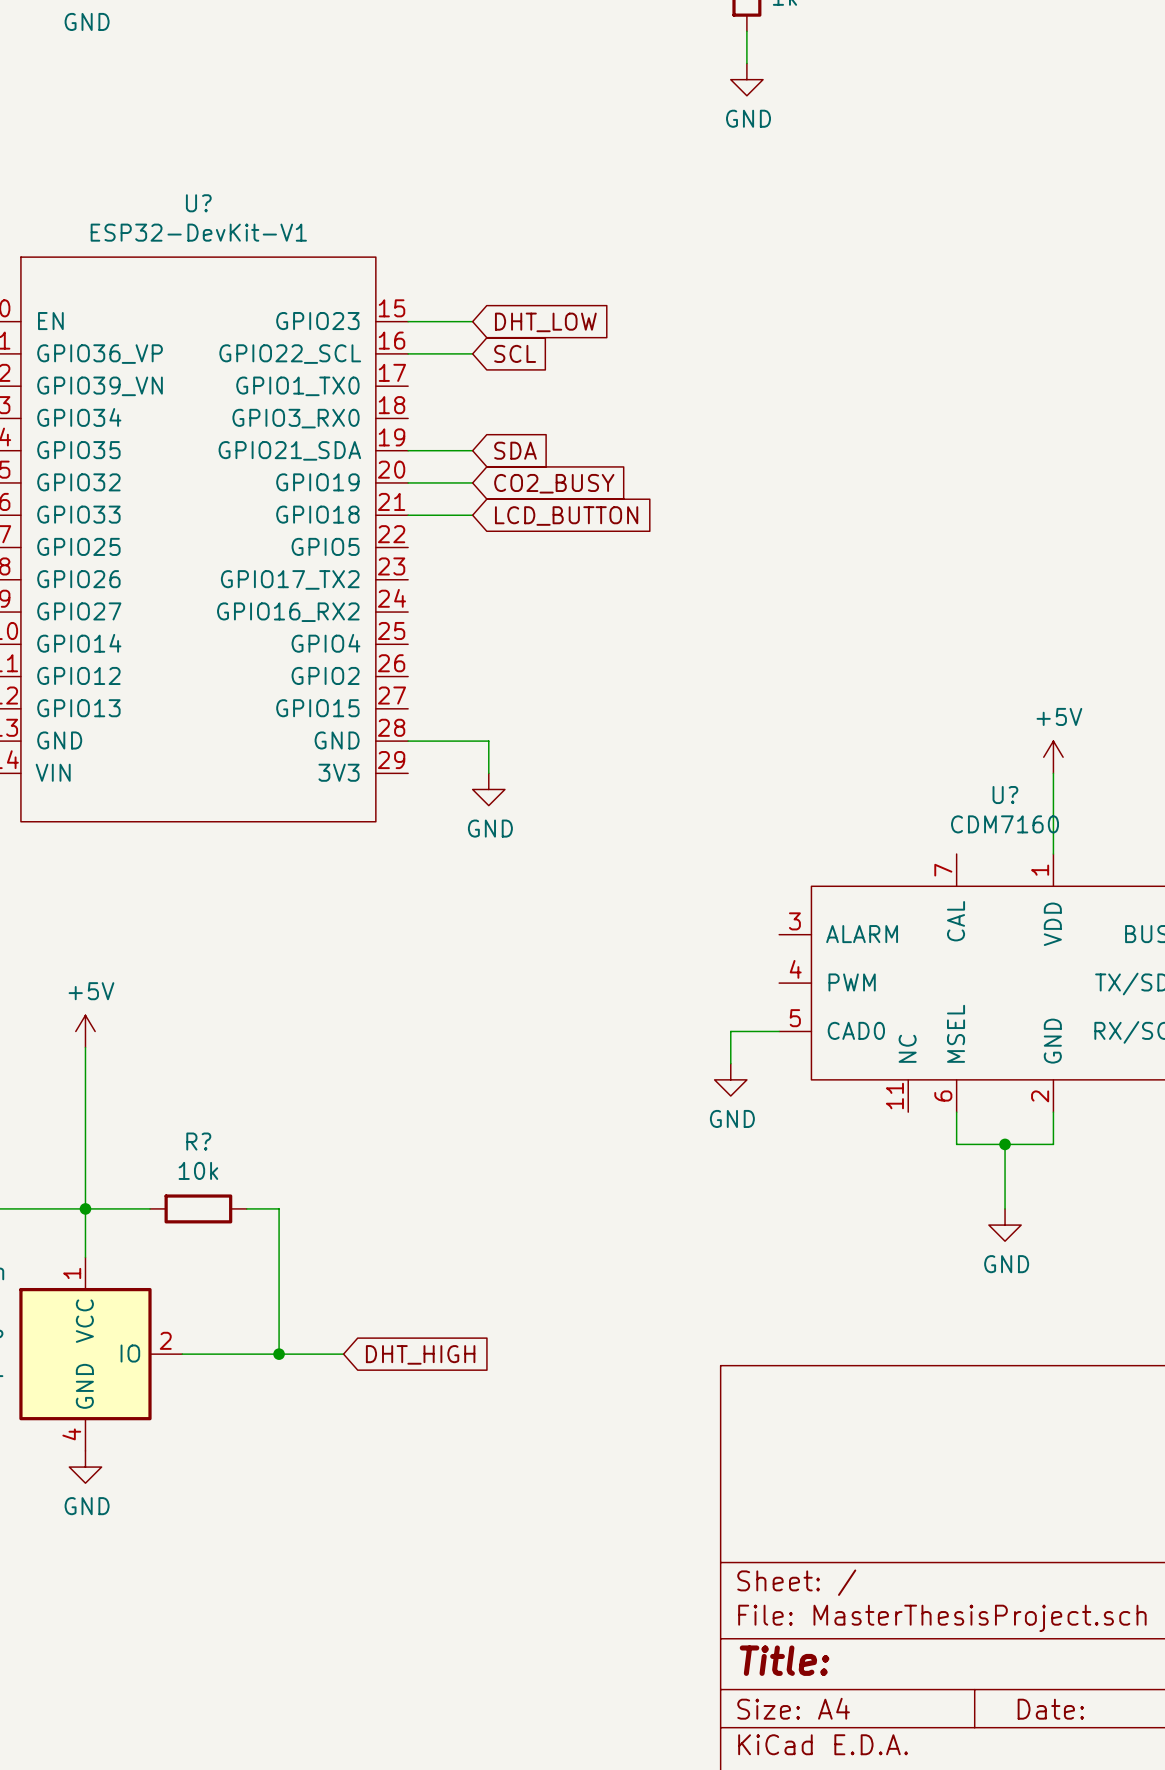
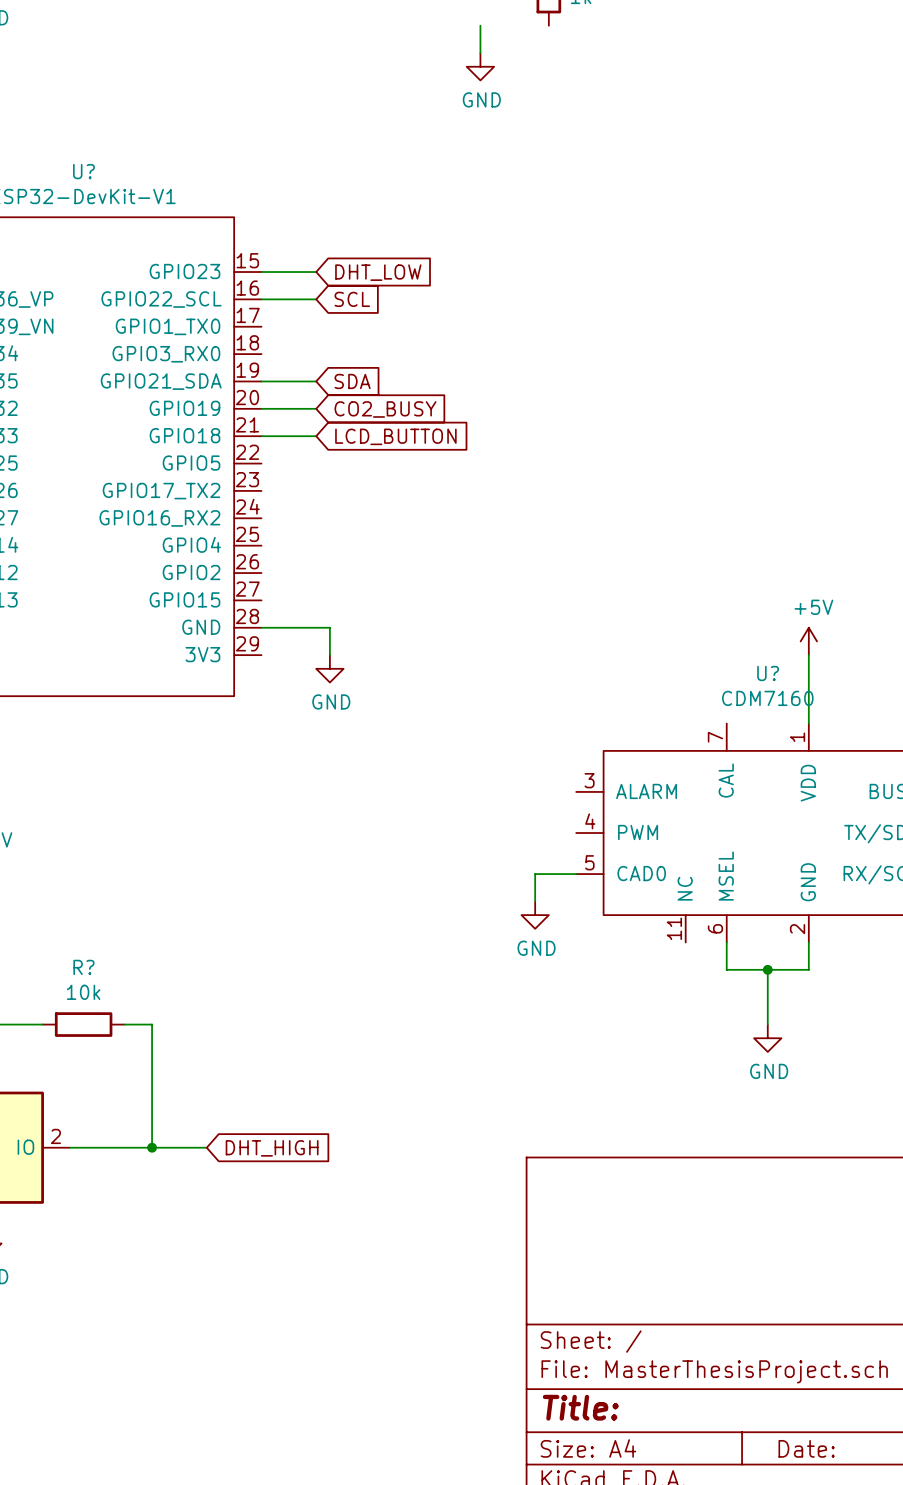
wire: (746, 31) (746, 63) -> (480, 25) (480, 53)
power symbol position: GND (746, 79) -> GND (480, 66)

